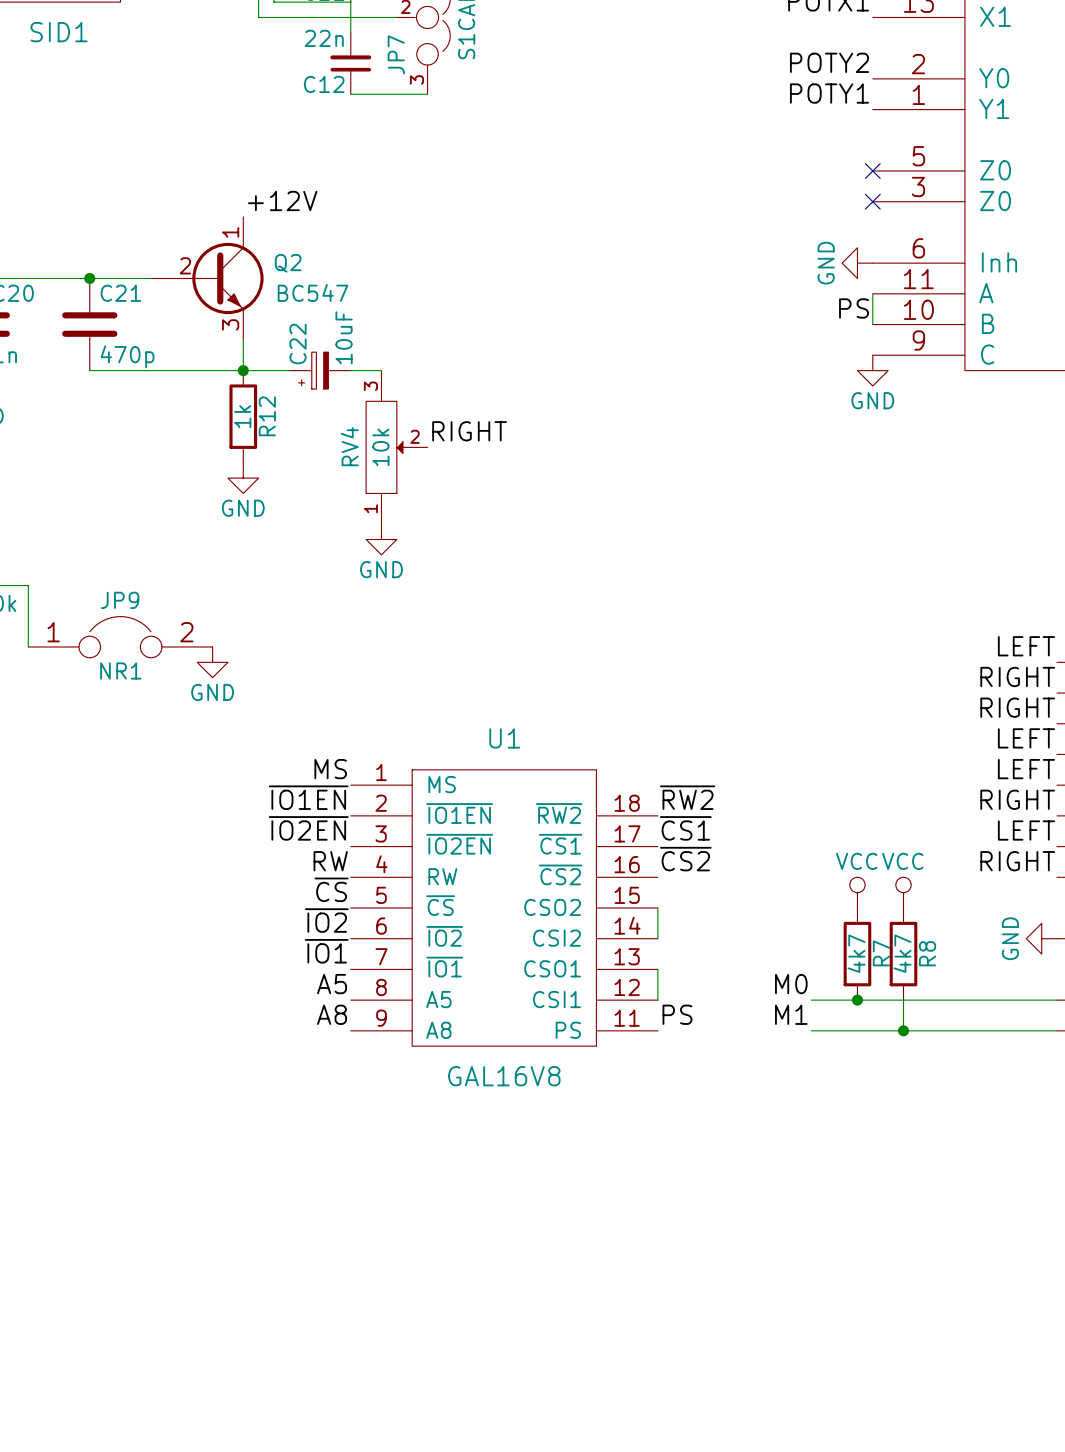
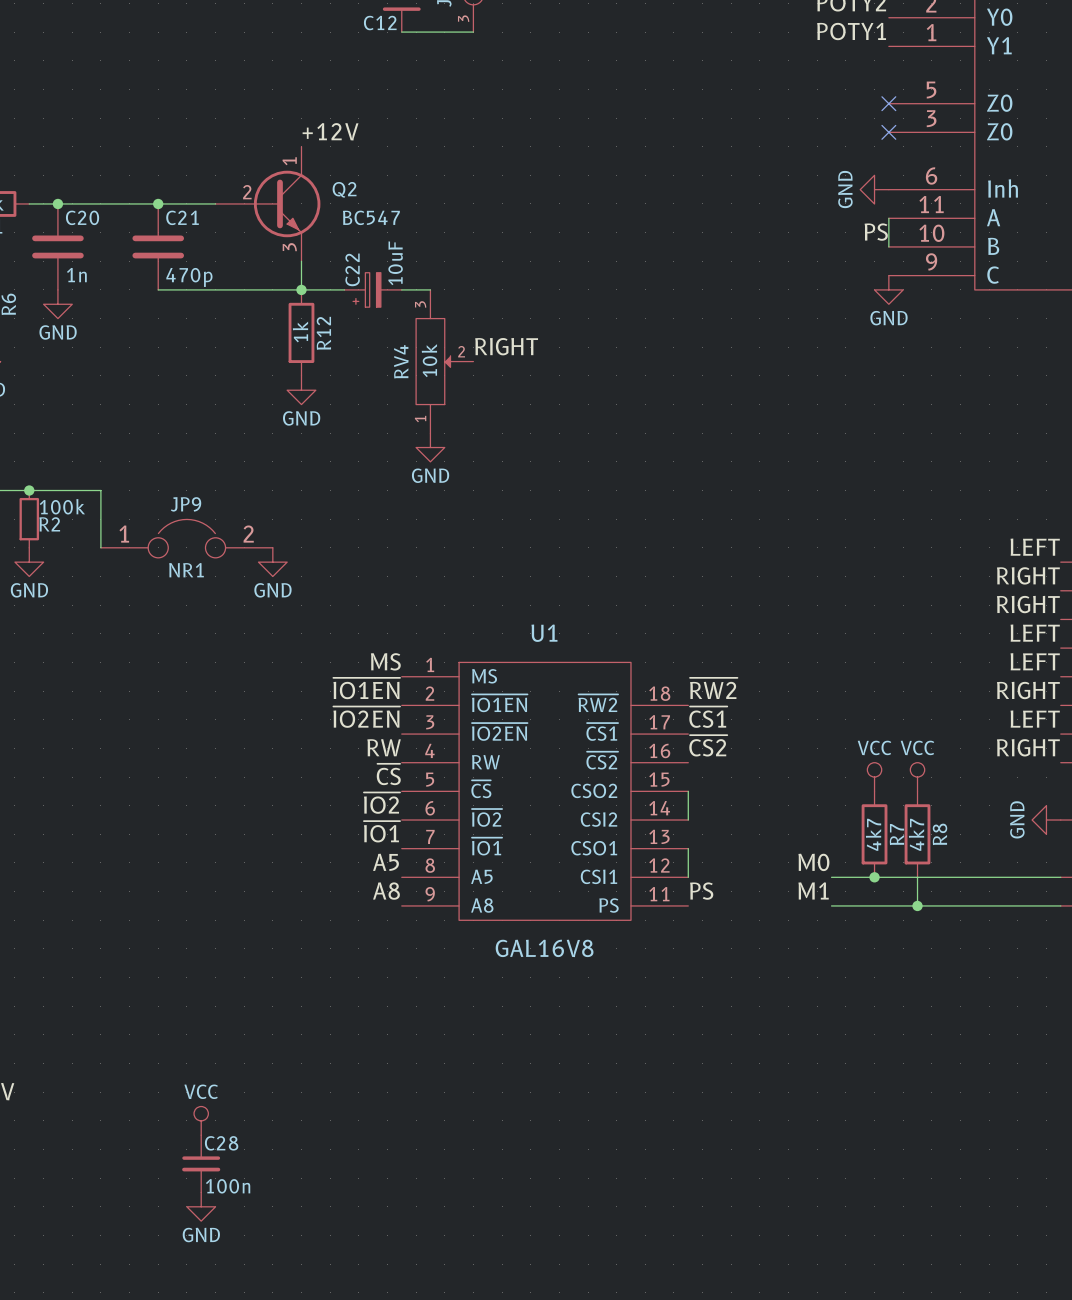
power symbol: none -> VCC (201, 1120)
C28: none -> 100n (201, 1163)
power symbol: none -> GND (201, 1206)

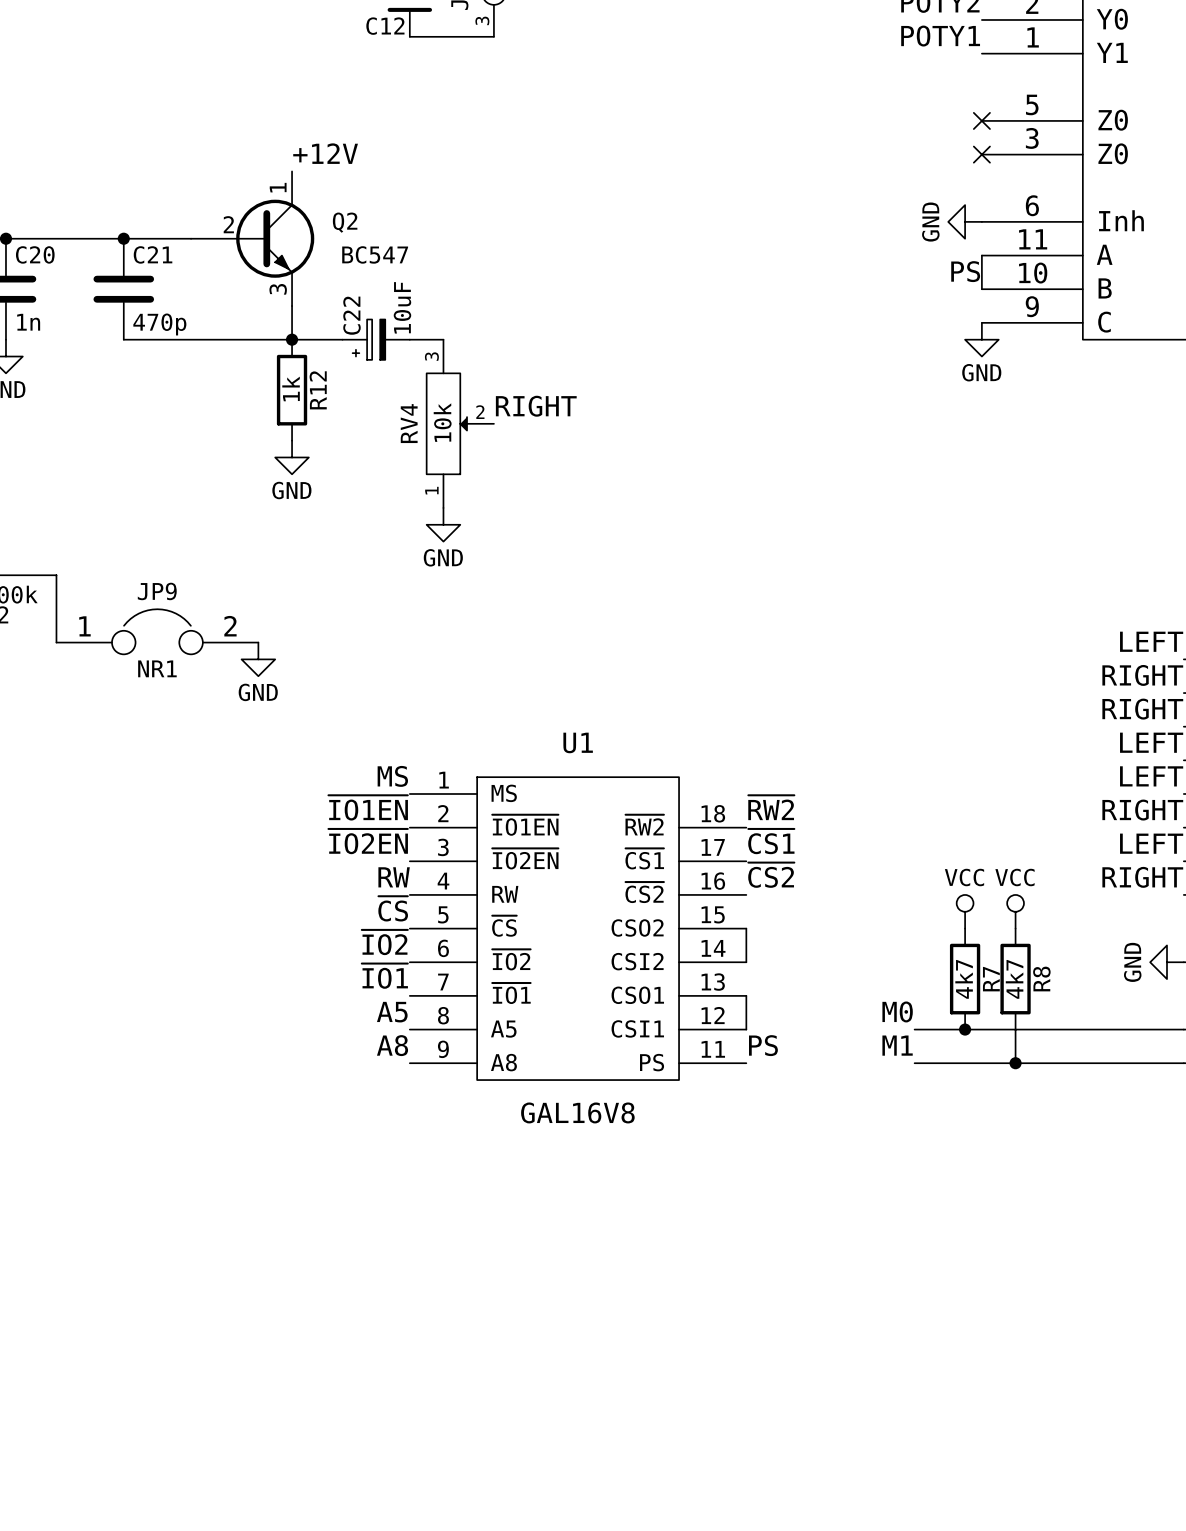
power symbol: VCC (201, 1120) -> none
C28: 100n (201, 1163) -> none
power symbol: GND (201, 1206) -> none

